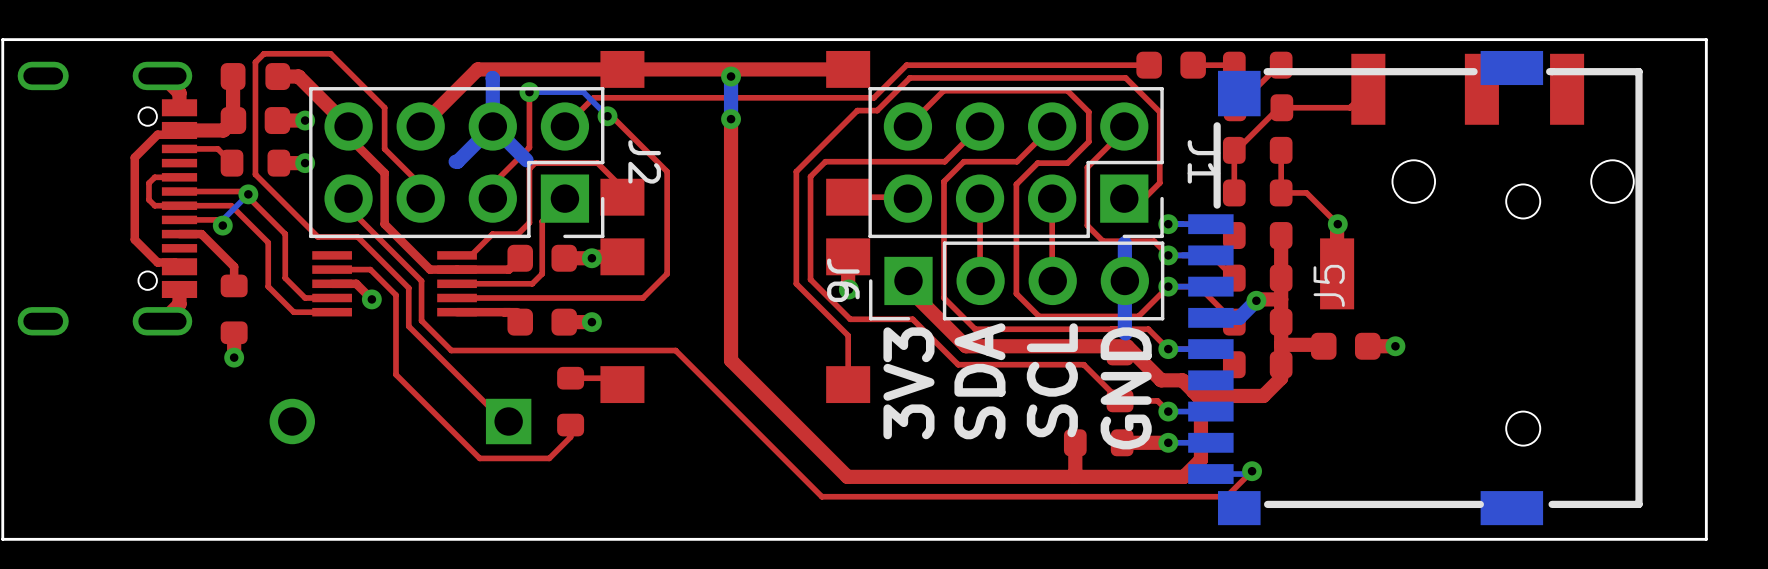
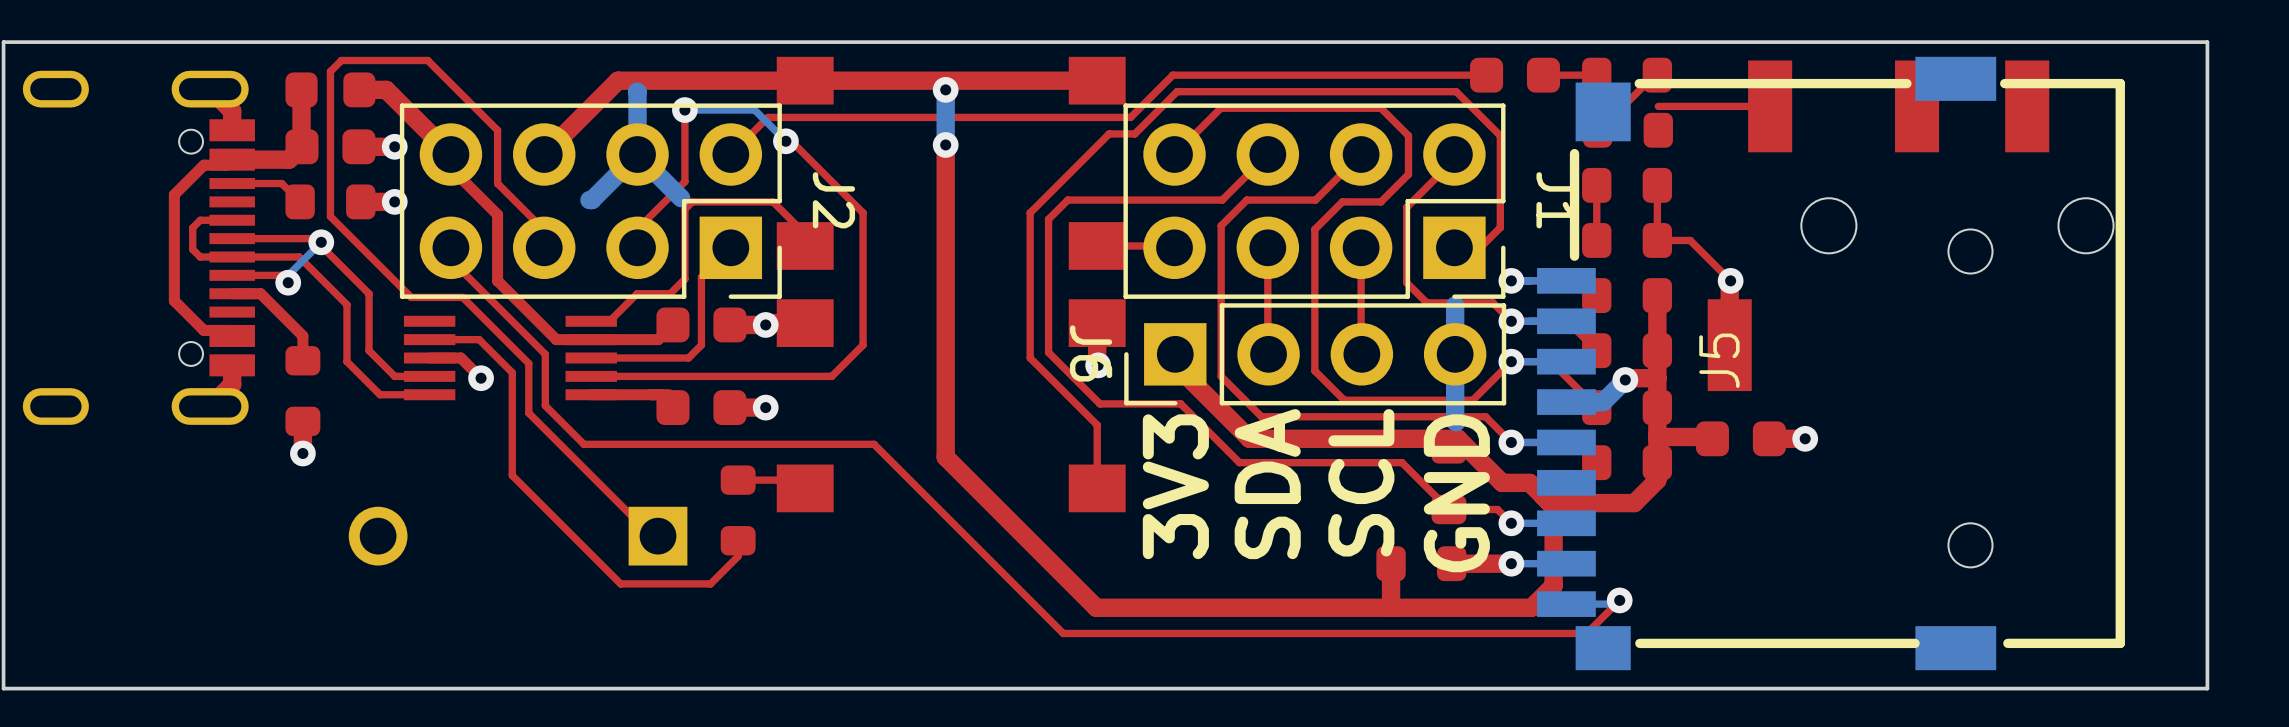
top track: (1368, 89) (1350, 107) (1279, 107) (1234, 150) -> (1770, 106) (1658, 106)

